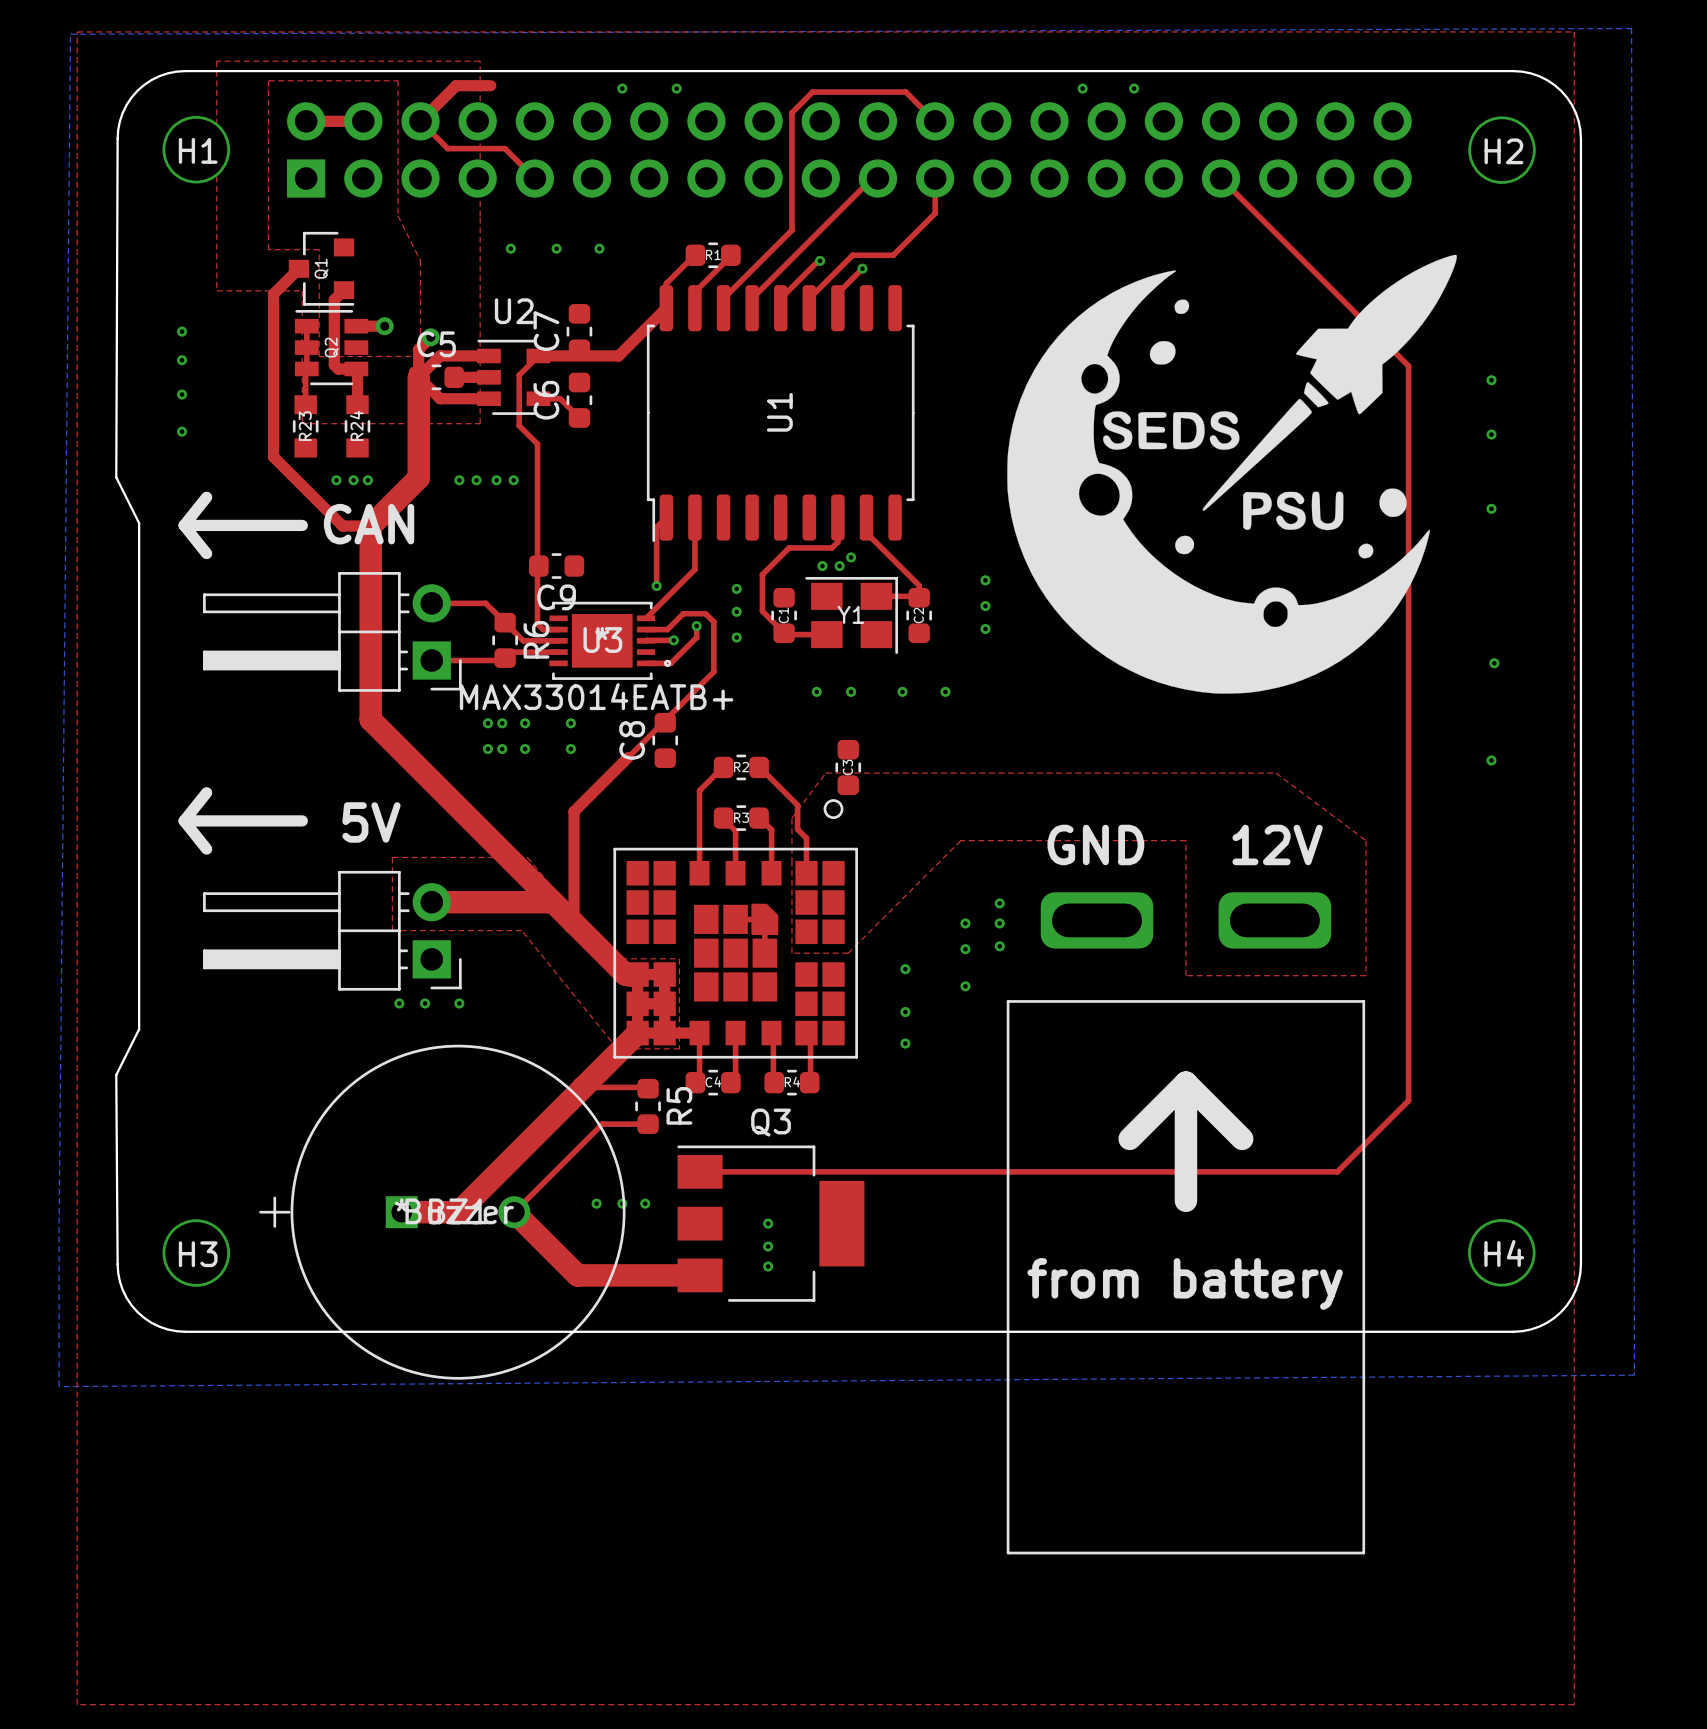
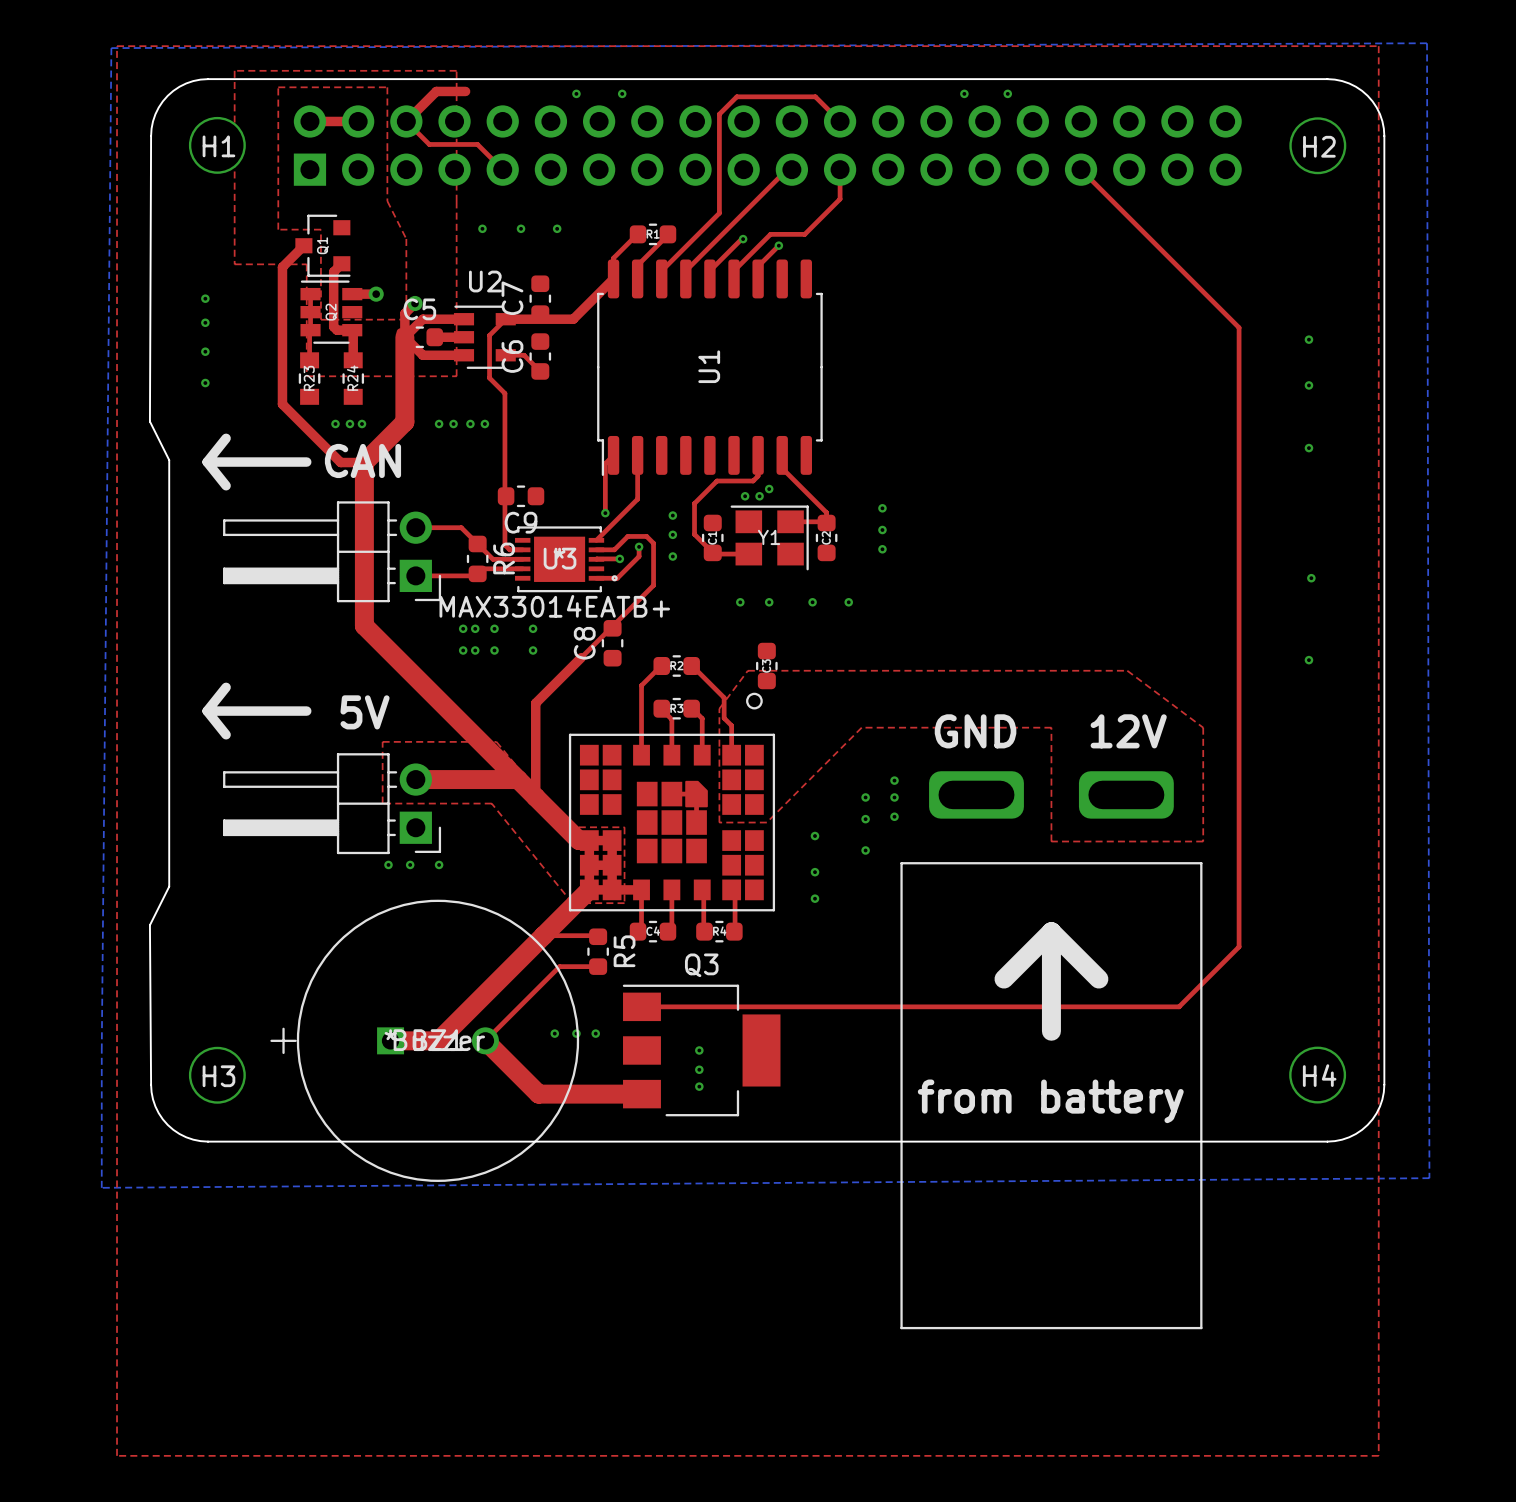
drawing: [1007, 254, 1457, 694] -> none

